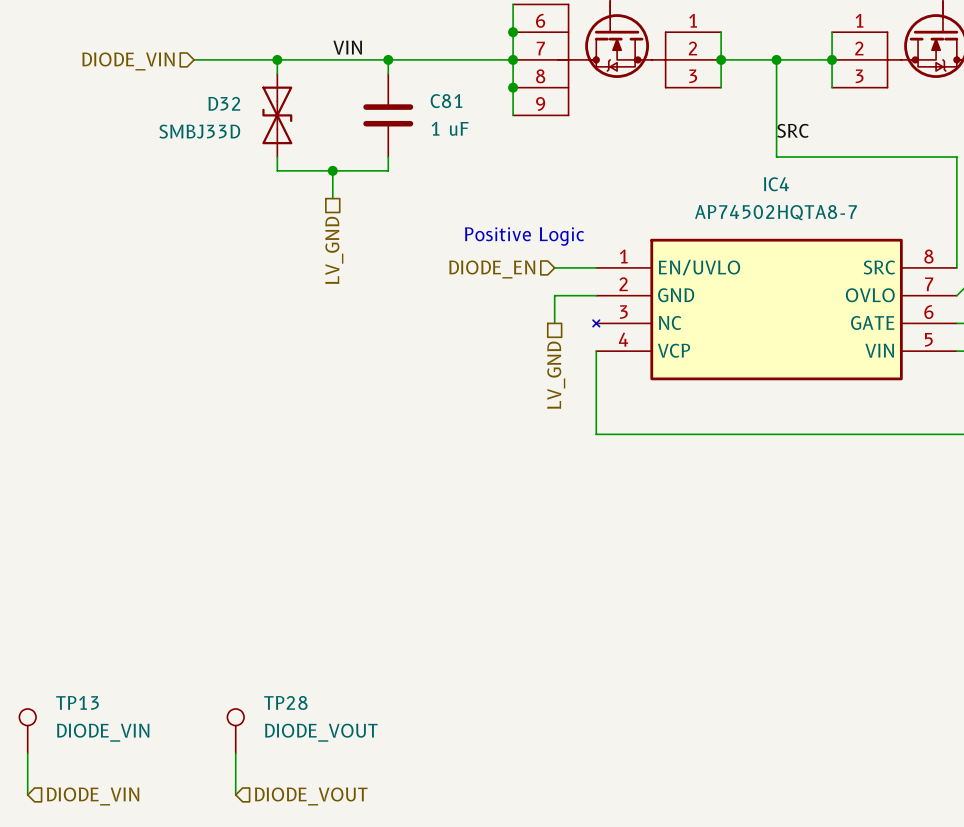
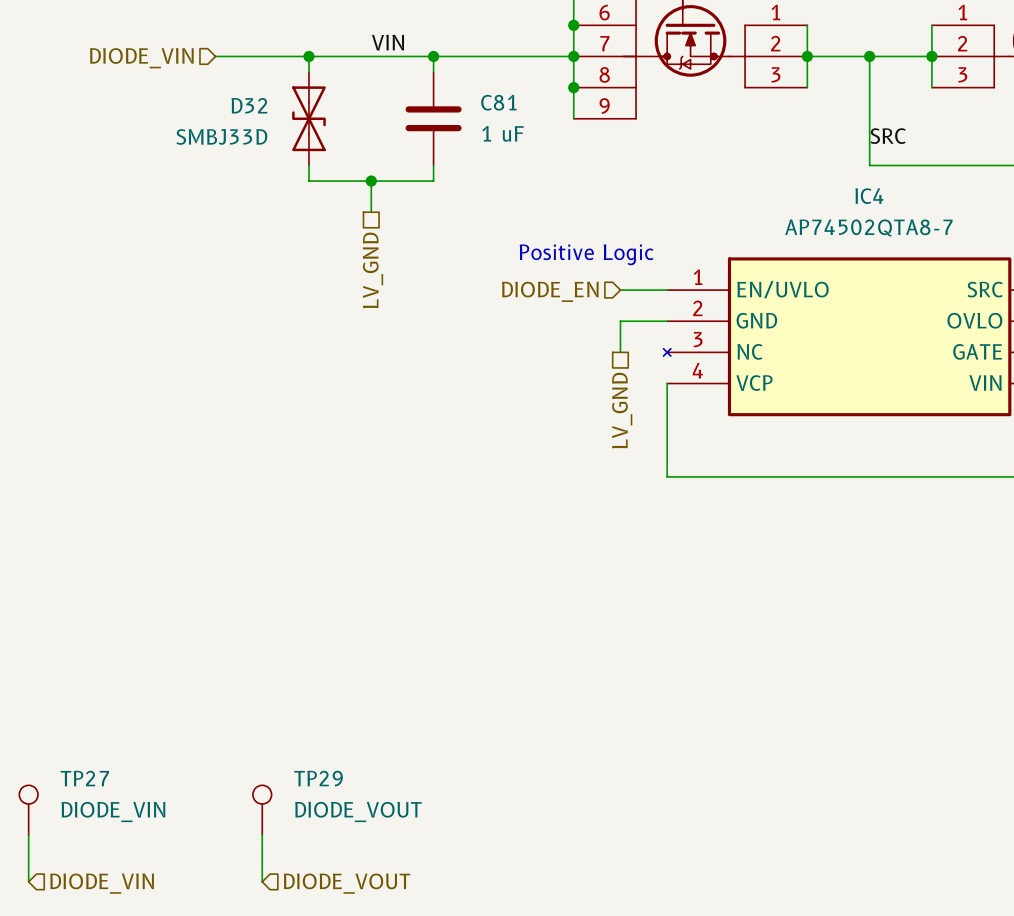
IC4 value: AP74502HQTA8-7 (775, 212) -> AP74502QTA8-7 (868, 227)
TP13 name: TP13 (77, 702) -> TP27 (84, 778)
TP28 name: TP28 (285, 702) -> TP29 (318, 778)

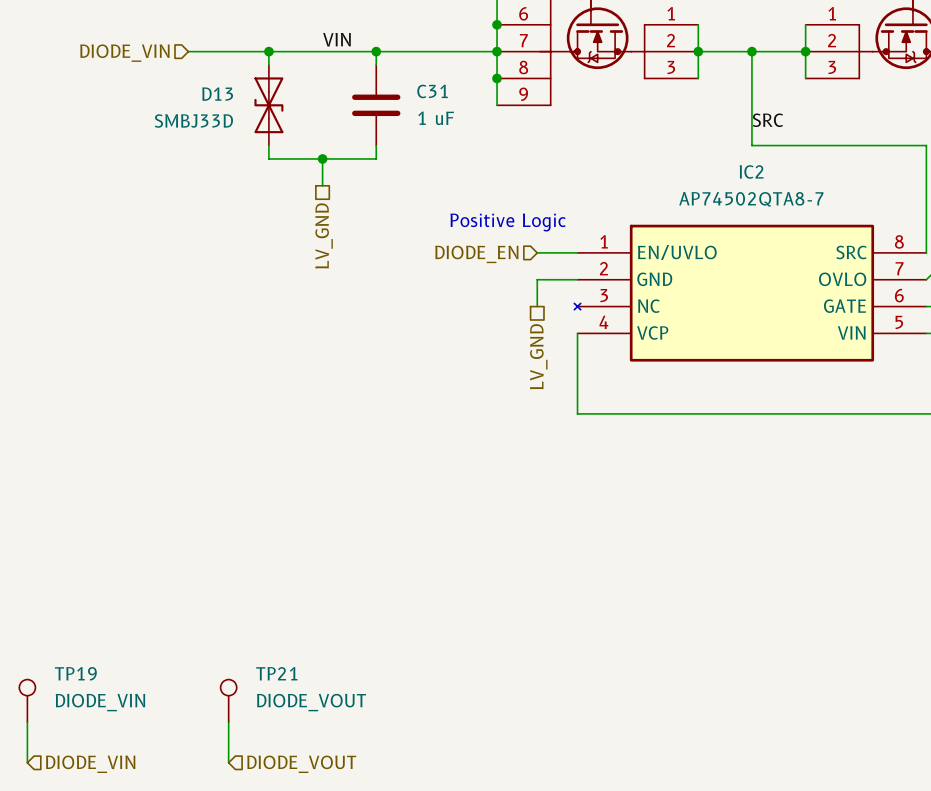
C81 name: C81 (498, 102) -> C31 (432, 91)
D32 name: D32 (249, 105) -> D13 (217, 94)
IC4 name: IC4 (869, 196) -> IC2 (751, 171)
TP27 name: TP27 (84, 778) -> TP19 (75, 673)
TP29 name: TP29 (318, 778) -> TP21 (276, 673)

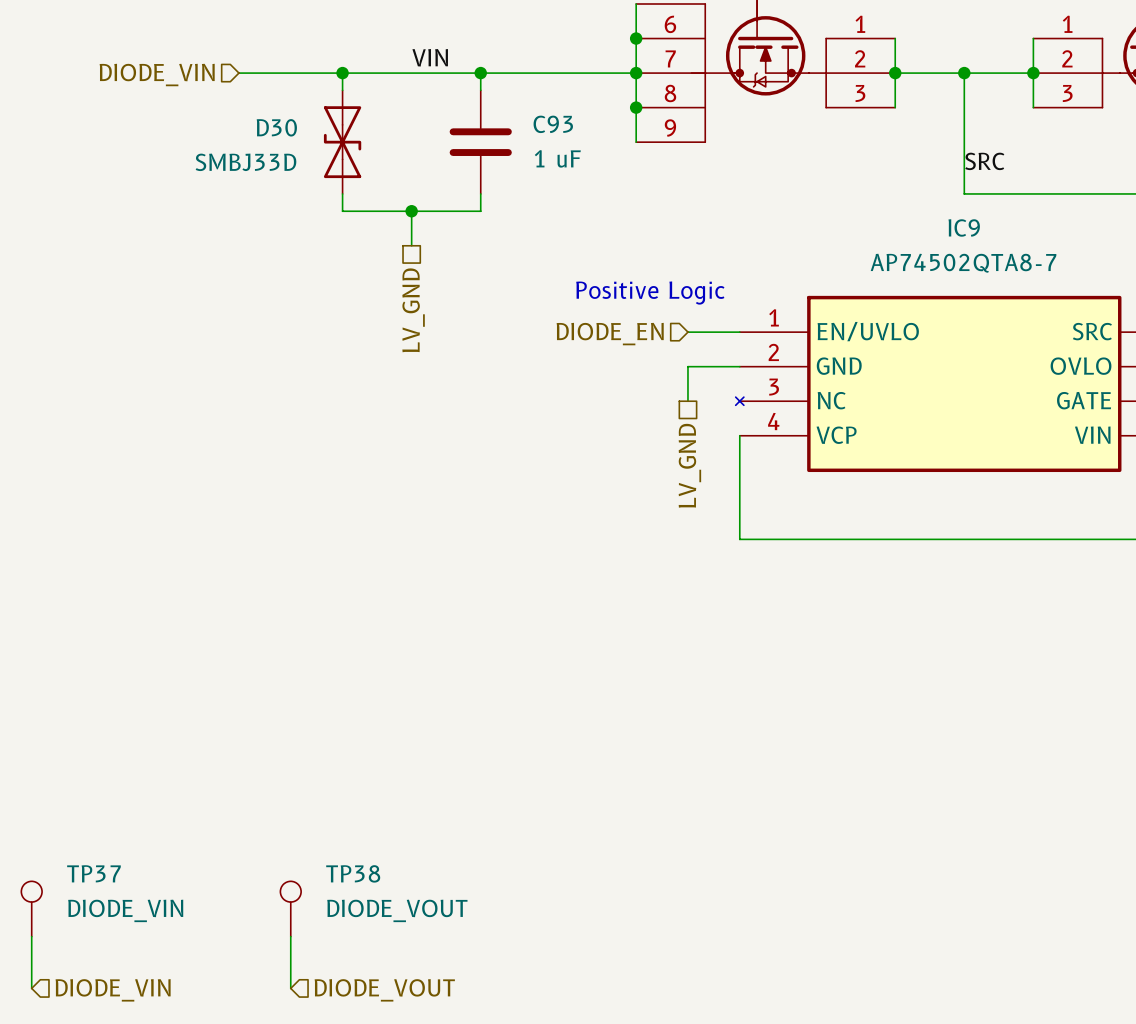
C31 name: C31 (432, 91) -> C93 (553, 124)
D13 name: D13 (217, 94) -> D30 (276, 127)
IC2 name: IC2 (751, 171) -> IC9 (964, 227)
TP19 name: TP19 (75, 673) -> TP37 (93, 873)
TP21 name: TP21 (276, 673) -> TP38 (353, 873)

